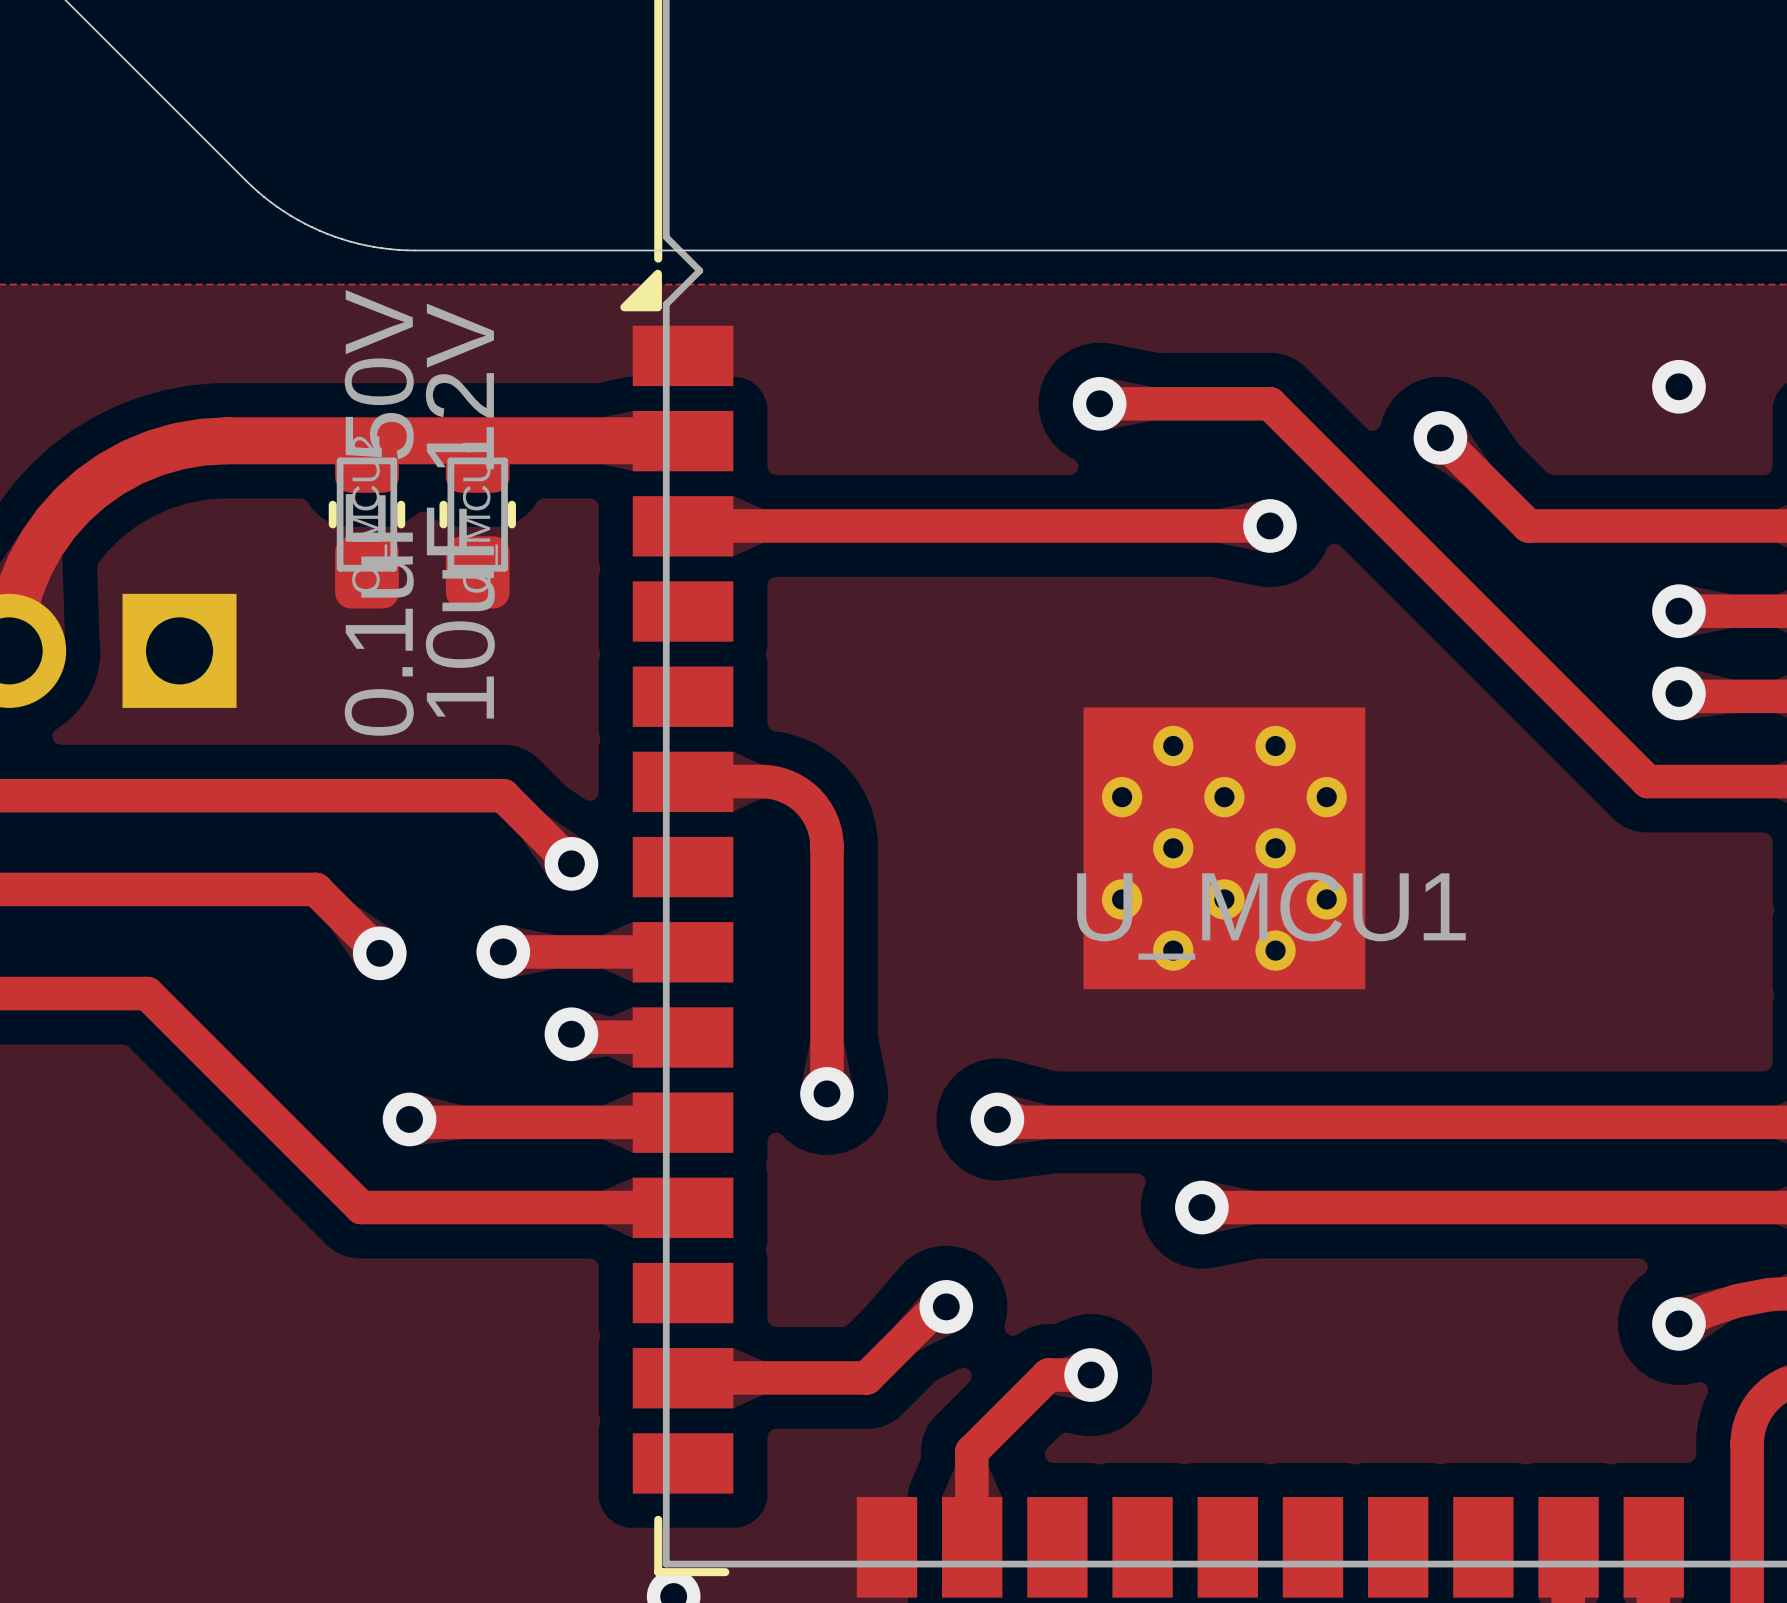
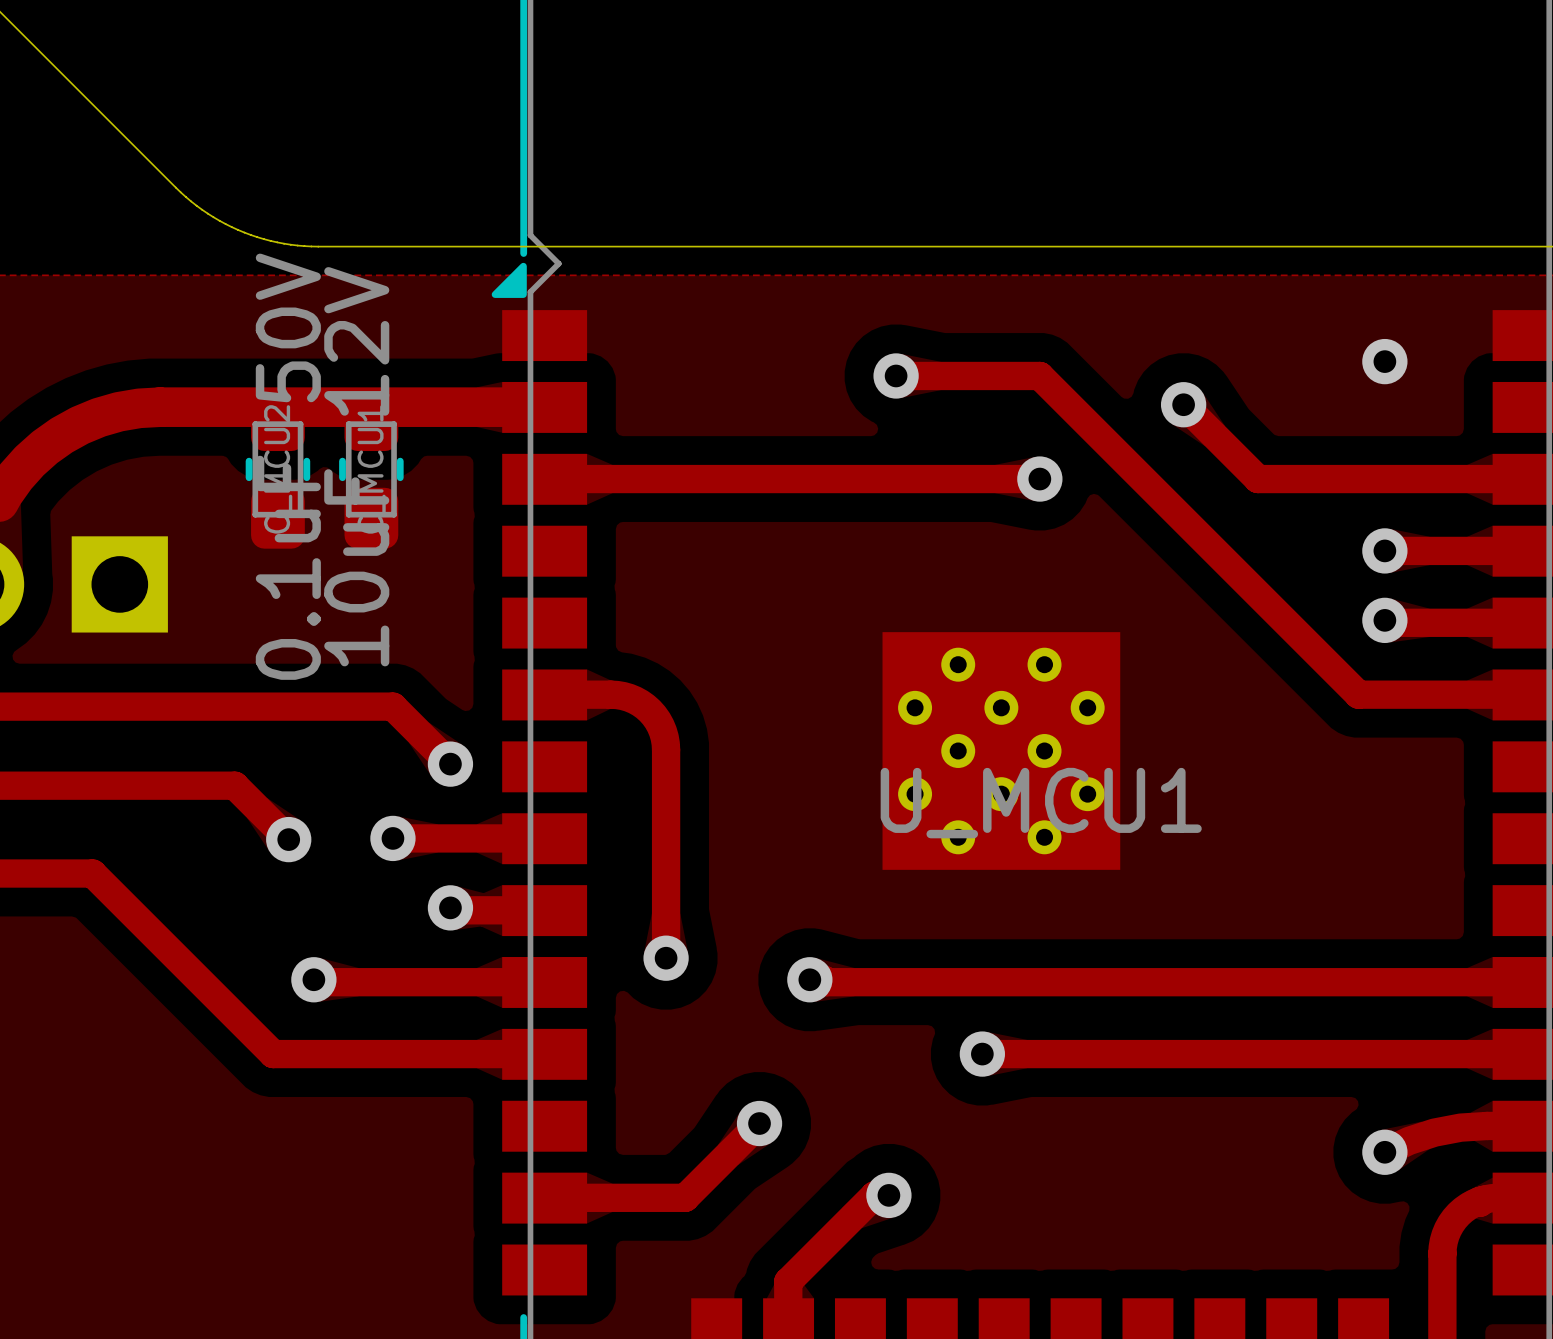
track: (946, 1306) (937, 1306) (866, 1377) (849, 1377) -> (759, 1123) (685, 1197)
via position: (946, 1306) -> (759, 1123)
track: (1074, 1375) (1048, 1375) (971, 1451) (971, 1477) -> (874, 1195) (788, 1281)

